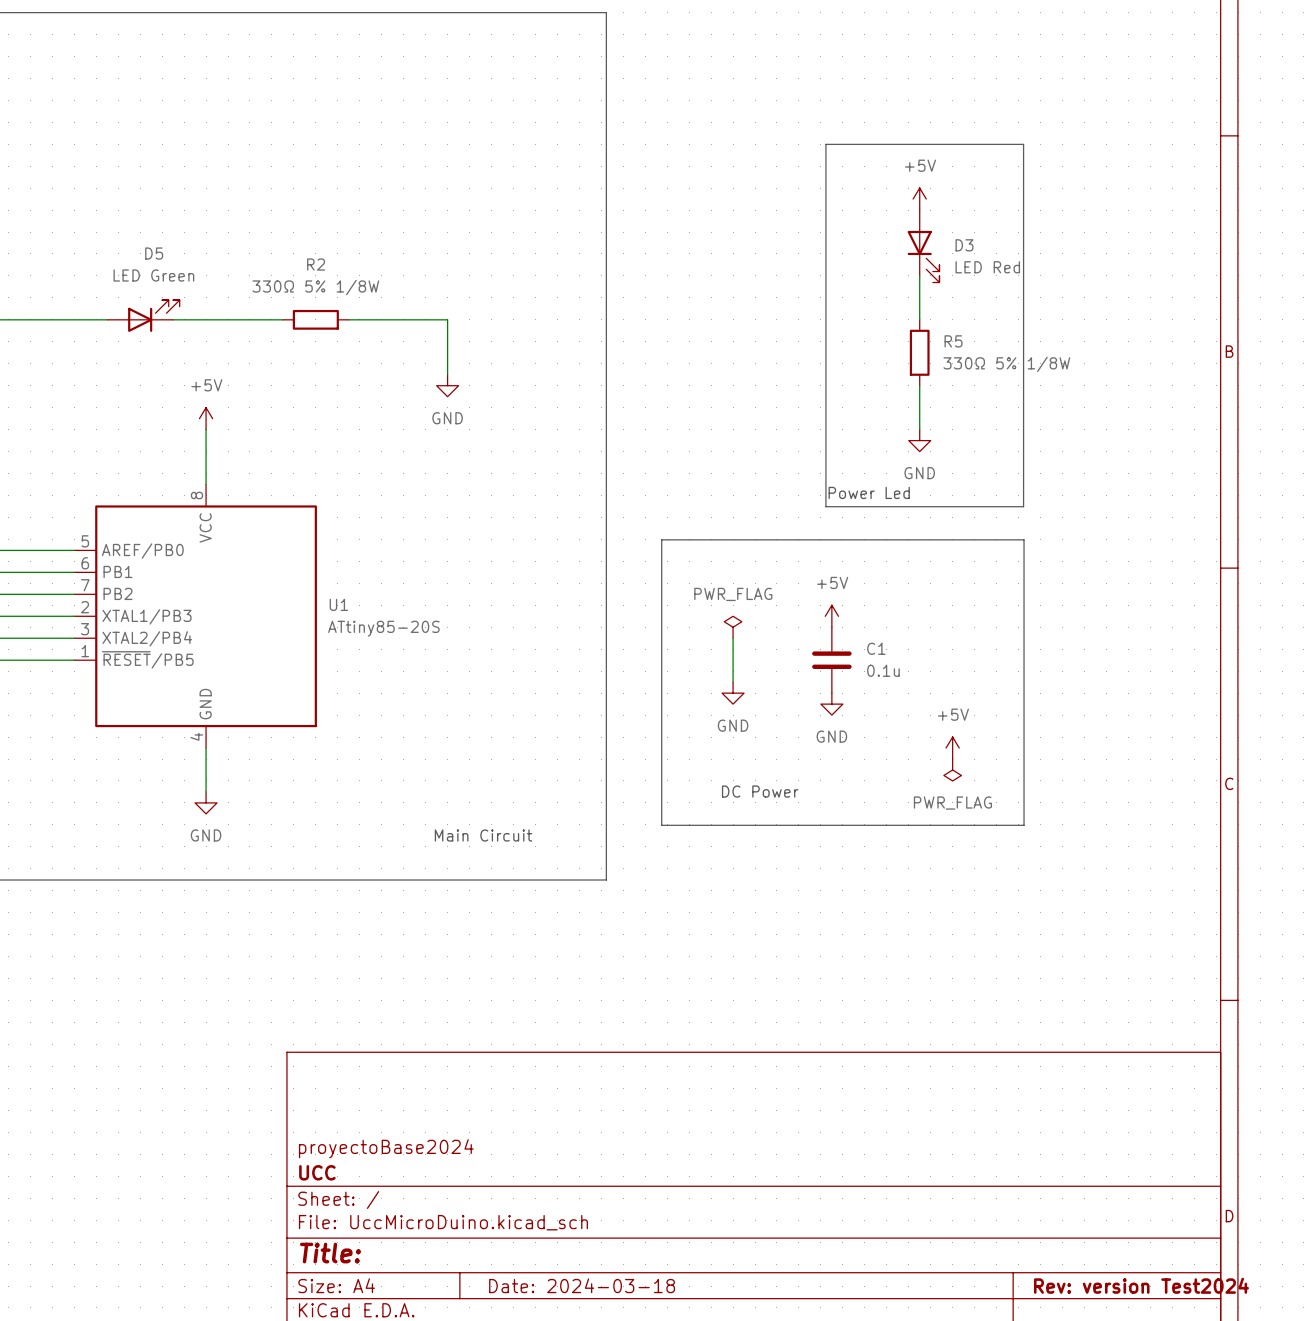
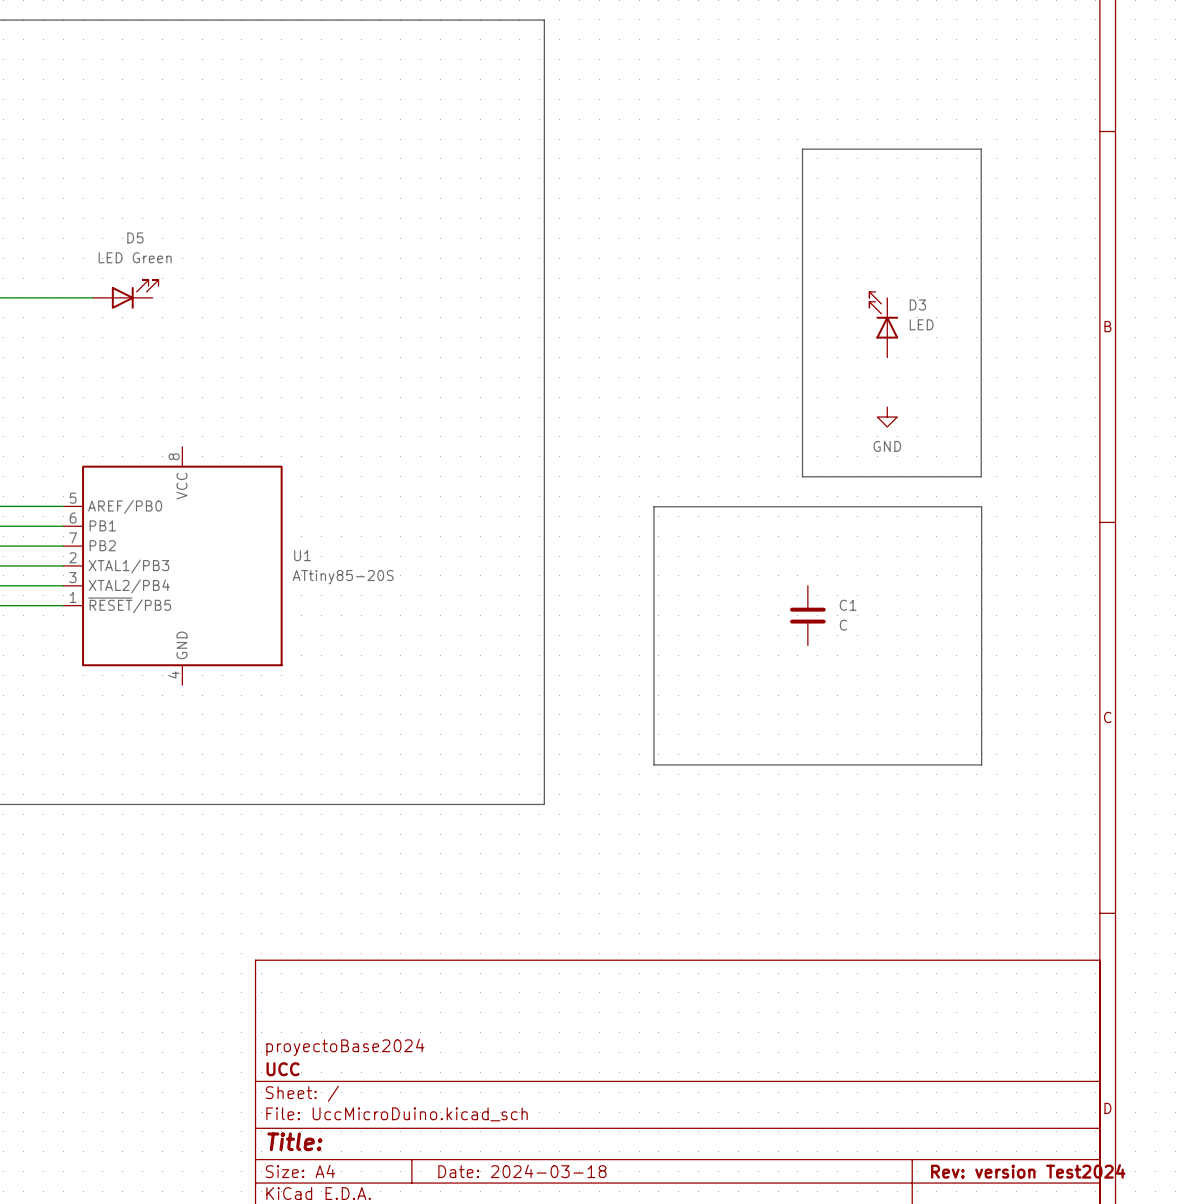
line: (825, 144) (825, 506) (1023, 506) (1023, 144) (825, 144) -> (802, 149) (802, 476) (981, 476) (981, 149) (802, 149)
power symbol: +5V (919, 199) -> none
D3 name position: D3 (964, 245) -> D3 (917, 304)
D3 position: (923, 246) -> (883, 324)
D3 rotation: 0° (923, 256) -> 180° (883, 315)
D3 value: LED Red (987, 267) -> LED (921, 324)
wire: (919, 275) (919, 319) -> none
wire: (173, 319) (282, 319) -> none
R2: 330Ω 5% 1/8W (315, 319) -> none
wire: (348, 319) (447, 319) (447, 374) -> none
R5: 330Ω 5% 1/8W (919, 352) -> none
power symbol: GND (447, 385) -> none
wire: (919, 385) (919, 429) -> none
power symbol: +5V (206, 418) -> none
wire: (206, 429) (206, 484) -> none
power symbol position: GND (919, 440) -> GND (887, 417)
text: Power Led (869, 492) -> none
line: (661, 539) (661, 825) (1024, 825) (1024, 539) (661, 539) -> (653, 506) (653, 764) (981, 764) (981, 506) (653, 506)
power symbol: +5V (831, 616) -> none
power symbol: PWR_FLAG (733, 627) -> none
wire: (733, 638) (733, 682) -> none
C1 position: (831, 660) -> (807, 615)
C1 value: 0.1u (883, 670) -> C (843, 625)
power symbol: GND (733, 693) -> none
power symbol: GND (831, 704) -> none
wire: (206, 748) (206, 791) -> none
power symbol: +5V (952, 748) -> none
power symbol: PWR_FLAG (952, 769) -> none
text: DC Power (760, 791) -> none
power symbol: GND (206, 802) -> none
text: Main Circuit (483, 835) -> none

